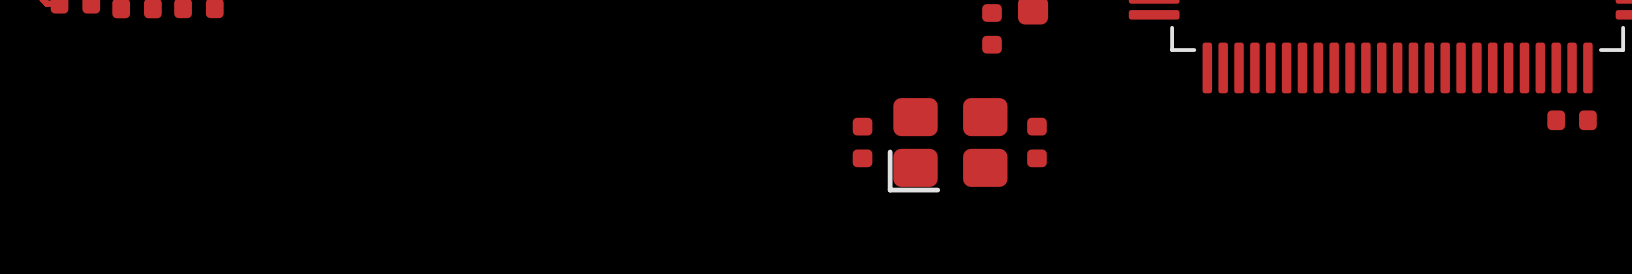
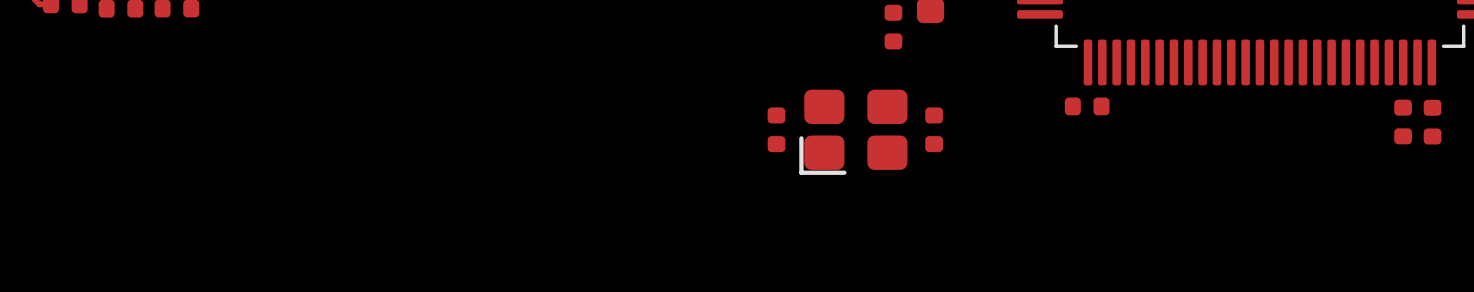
part: none -> (1087, 106)
part: (1572, 120) -> none
part: none -> (1403, 121)
part: none -> (1432, 122)

